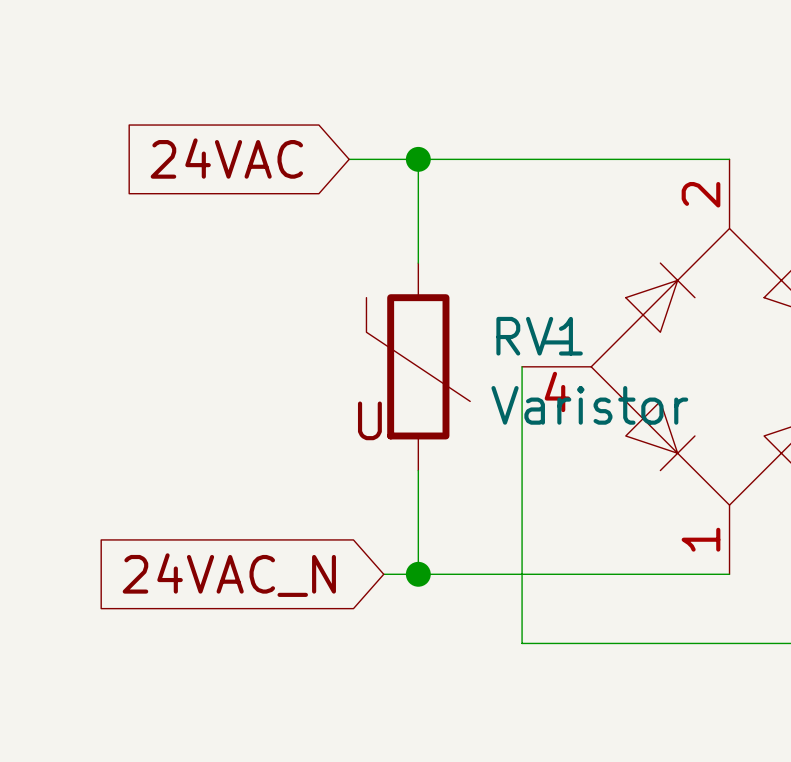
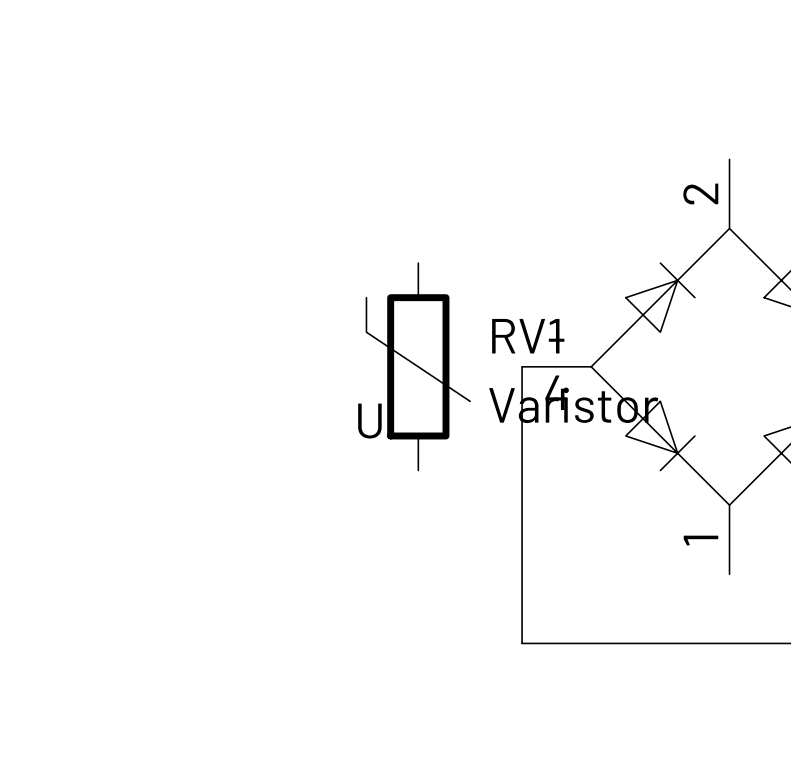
global label: 24VAC (226, 158) -> none
wire: (349, 159) (729, 159) -> none
wire: (418, 159) (418, 263) -> none
junction: (418, 159) -> none
wire: (418, 470) (418, 574) -> none
wire: (383, 574) (729, 574) -> none
junction: (418, 574) -> none
global label: 24VAC_N (229, 575) -> none

